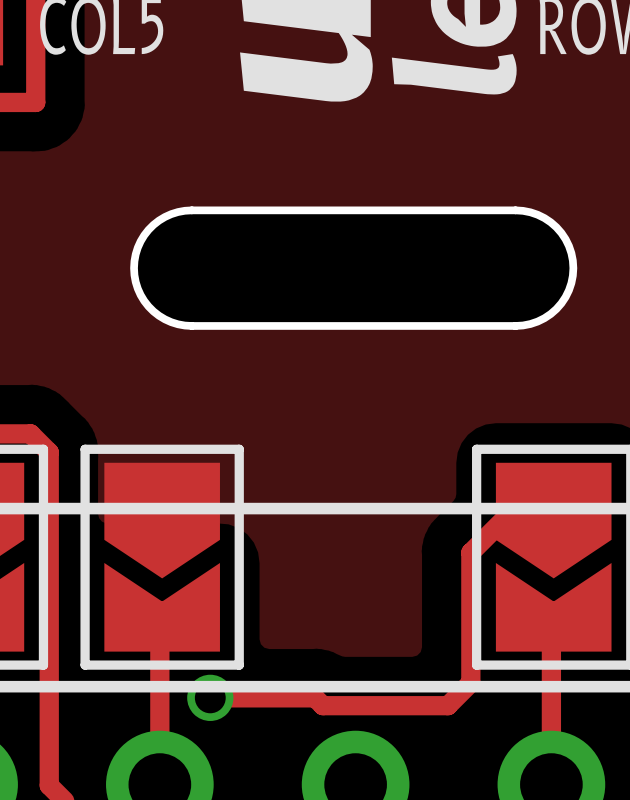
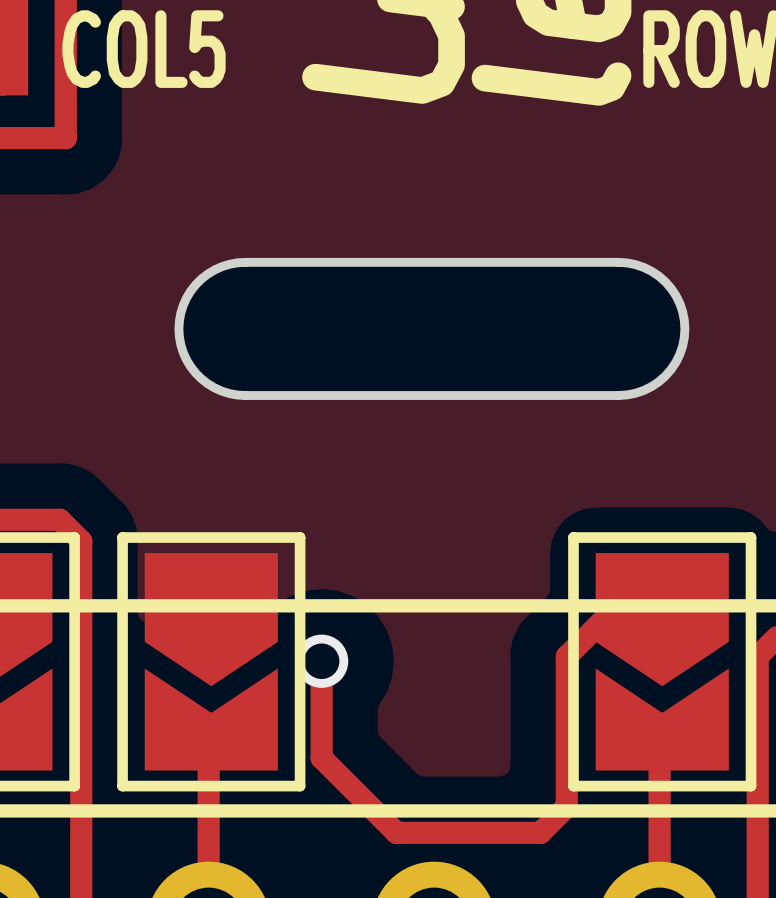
track: (210, 697) (315, 697) -> (321, 661) (321, 757) (387, 823)
via position: (210, 697) -> (321, 661)

